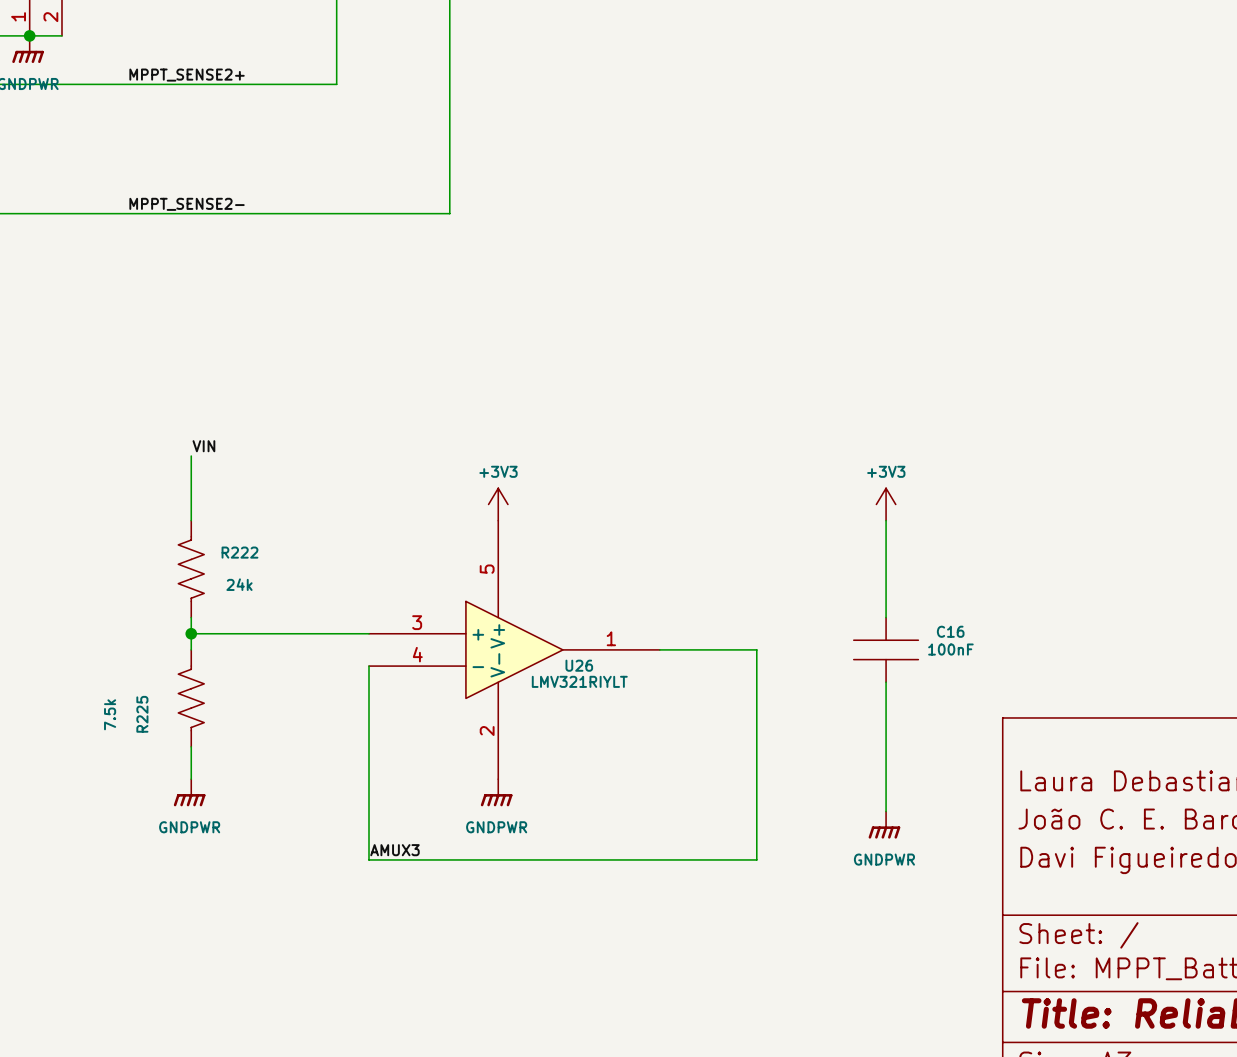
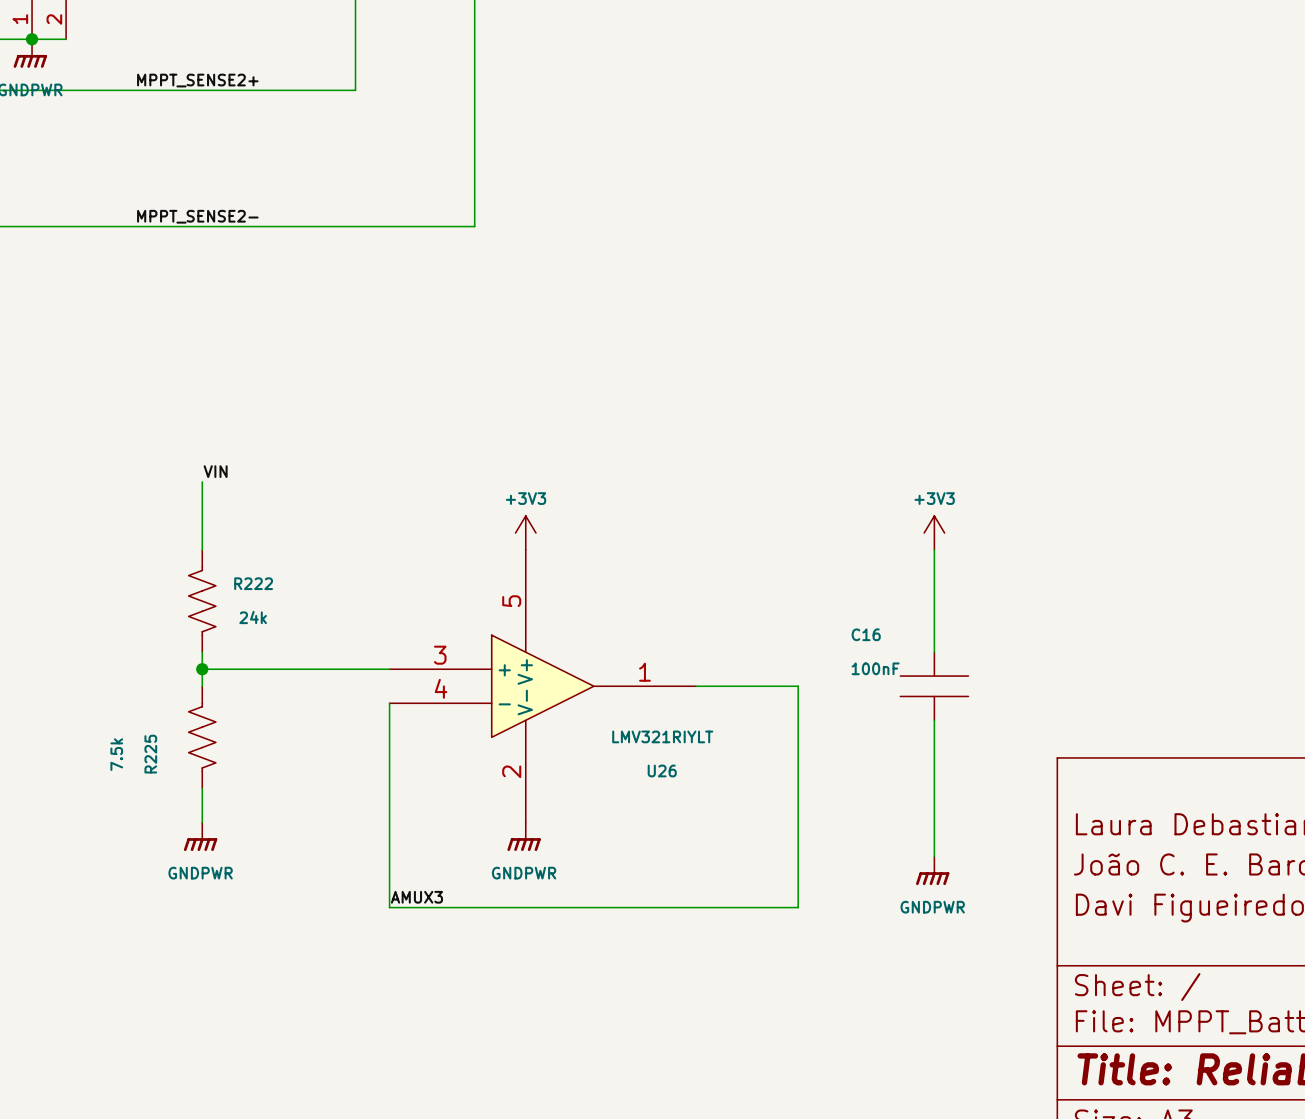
U26 symbol: [369, 520, 660, 780] -> [389, 550, 697, 823]
C16 name position: C16 (950, 631) -> C16 (866, 634)
C16 value position: 100nF (950, 649) -> 100nF (875, 668)
U26 name position: U26 (579, 665) -> U26 (662, 770)
U26 value position: LMV321RIYLT (579, 681) -> LMV321RIYLT (662, 736)

